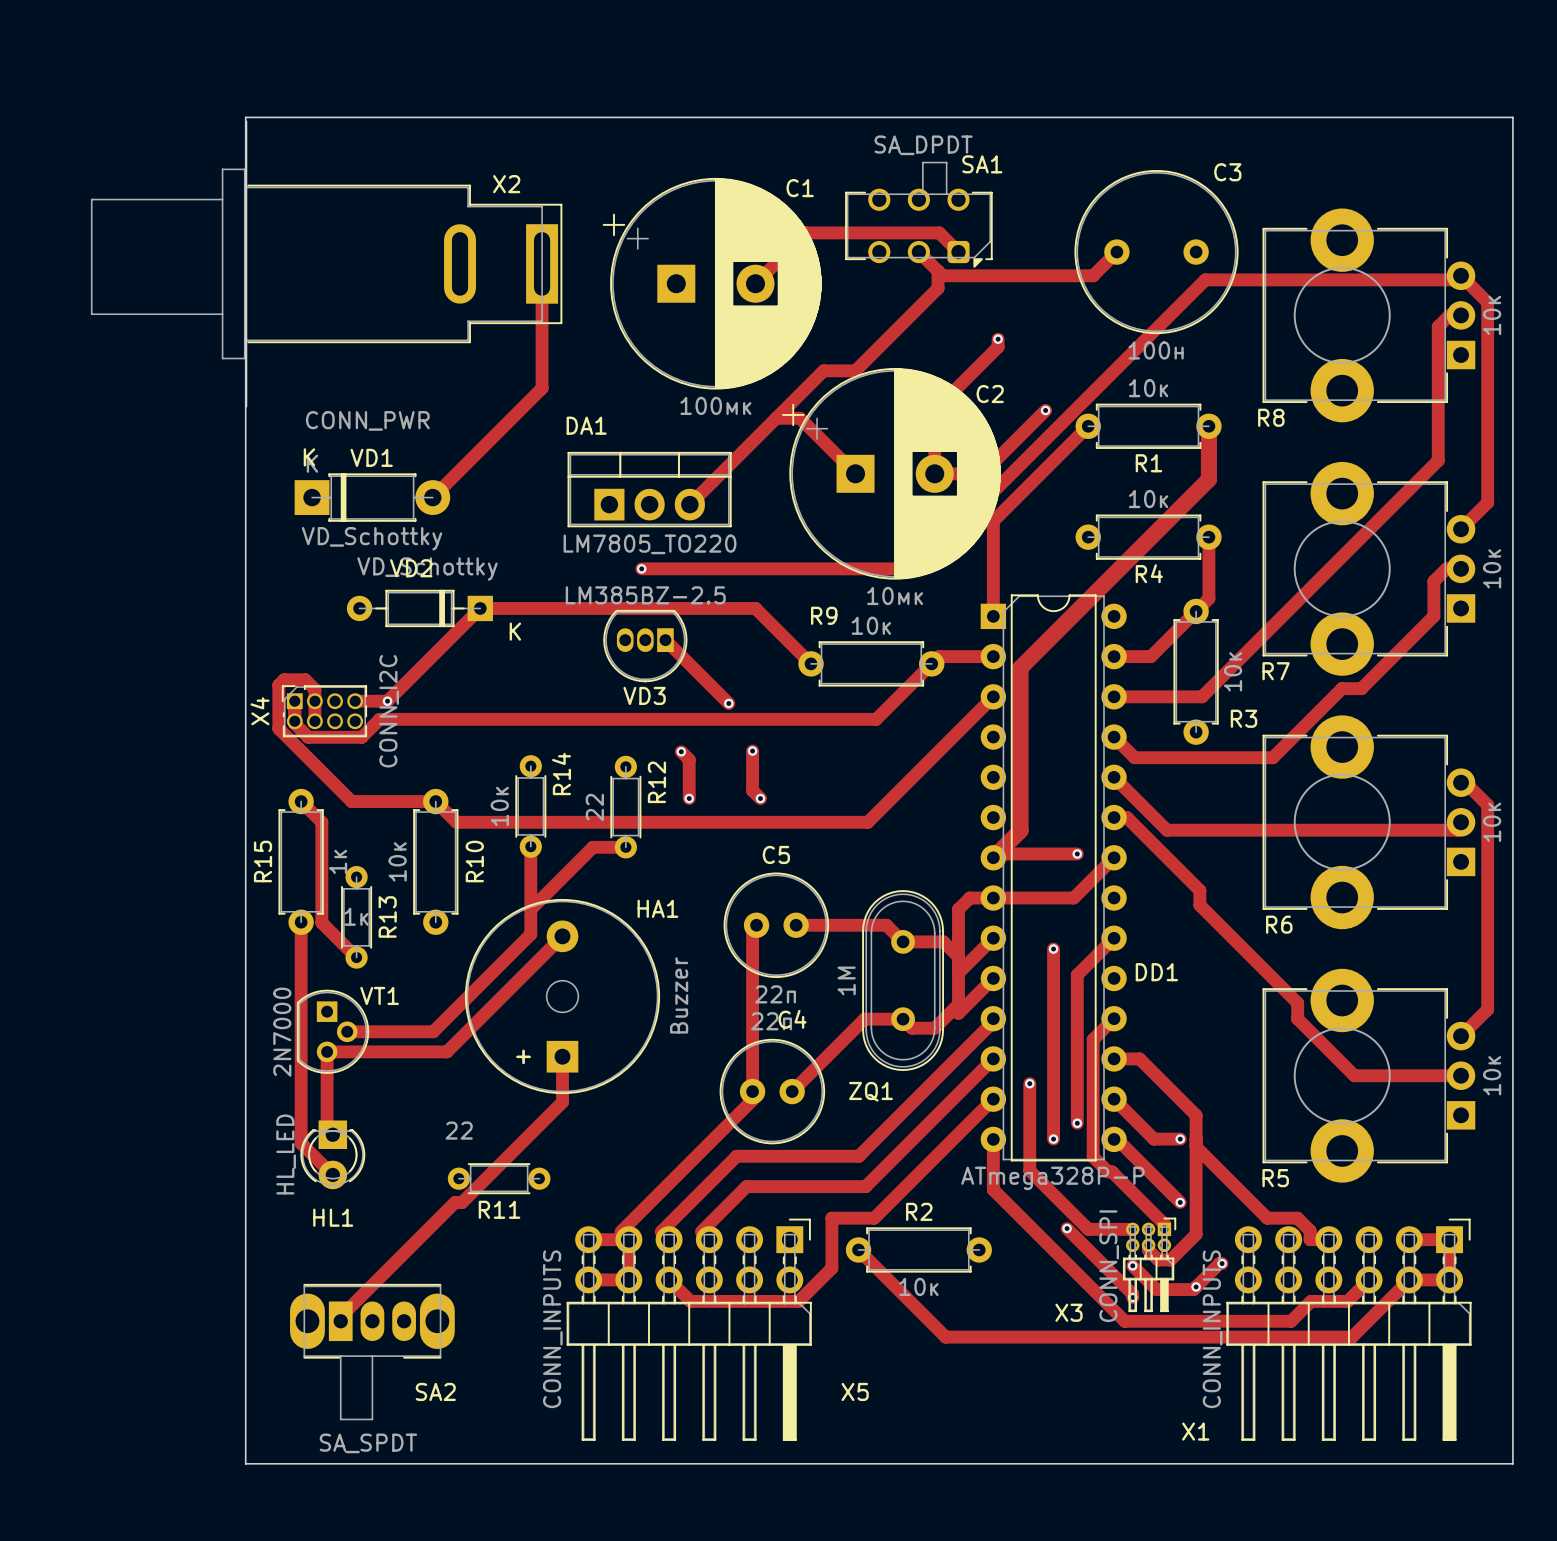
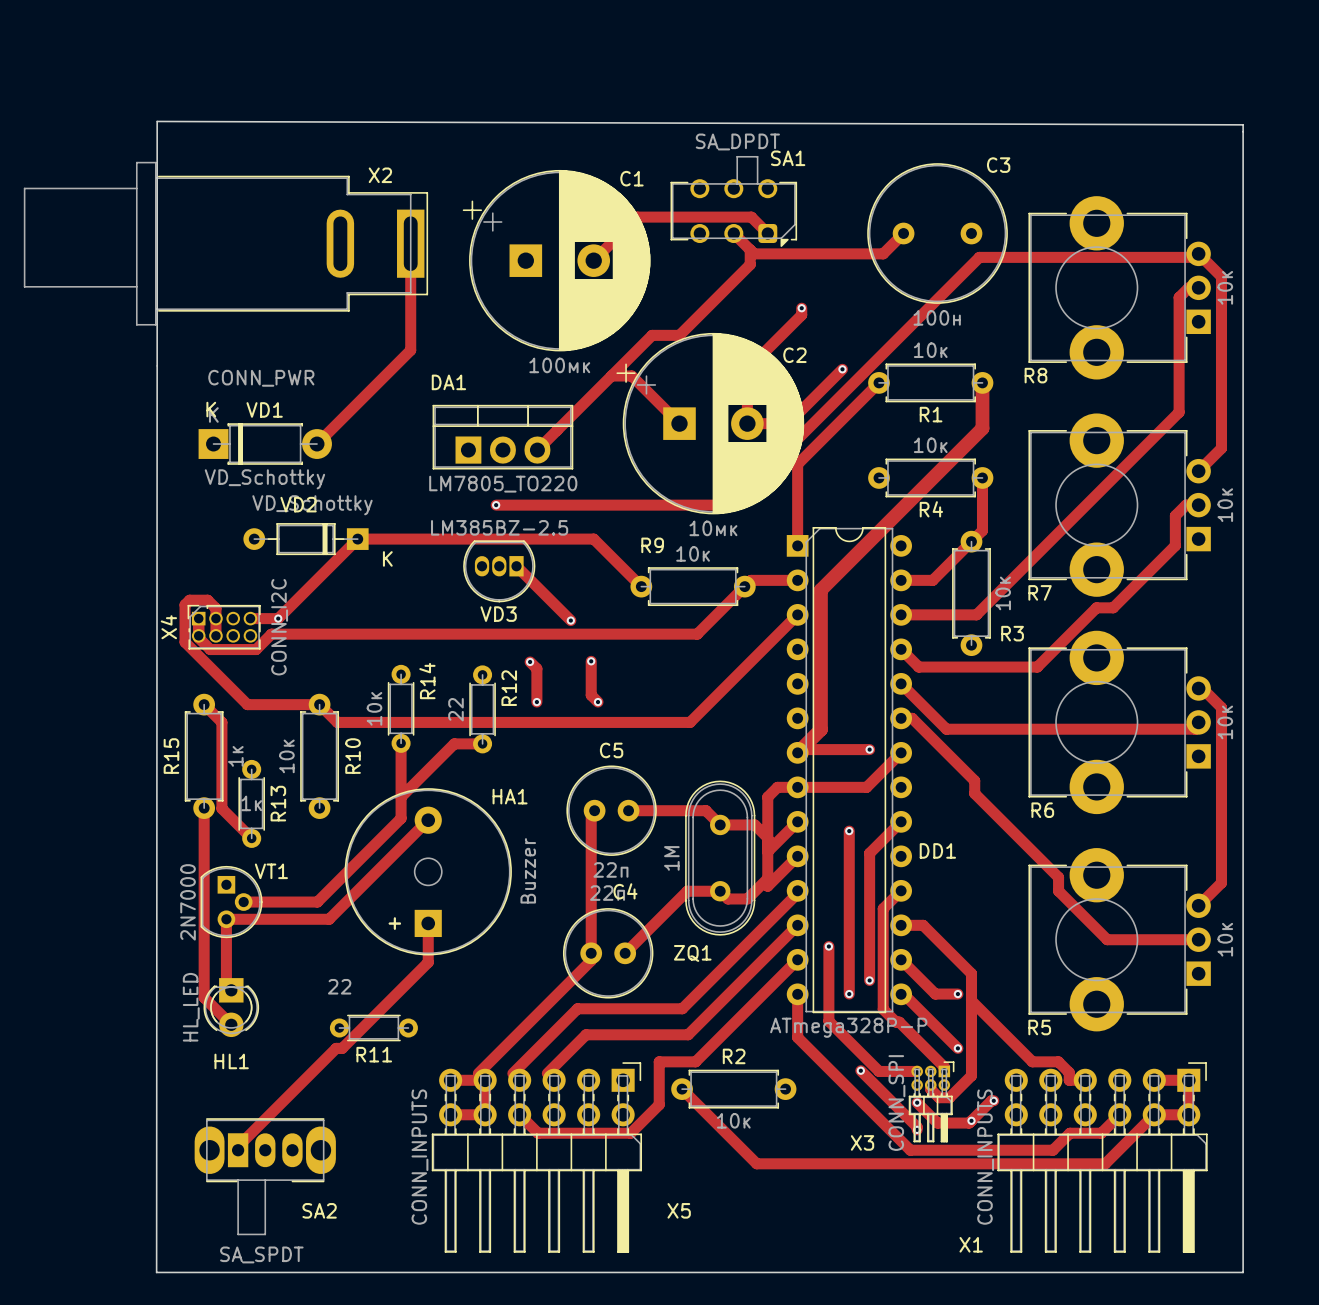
board edge: none -> (157, 121) (1243, 124)
board edge: (1512, 125) (1512, 117) (245, 117) (245, 1463) -> (157, 365) (156, 1272)

